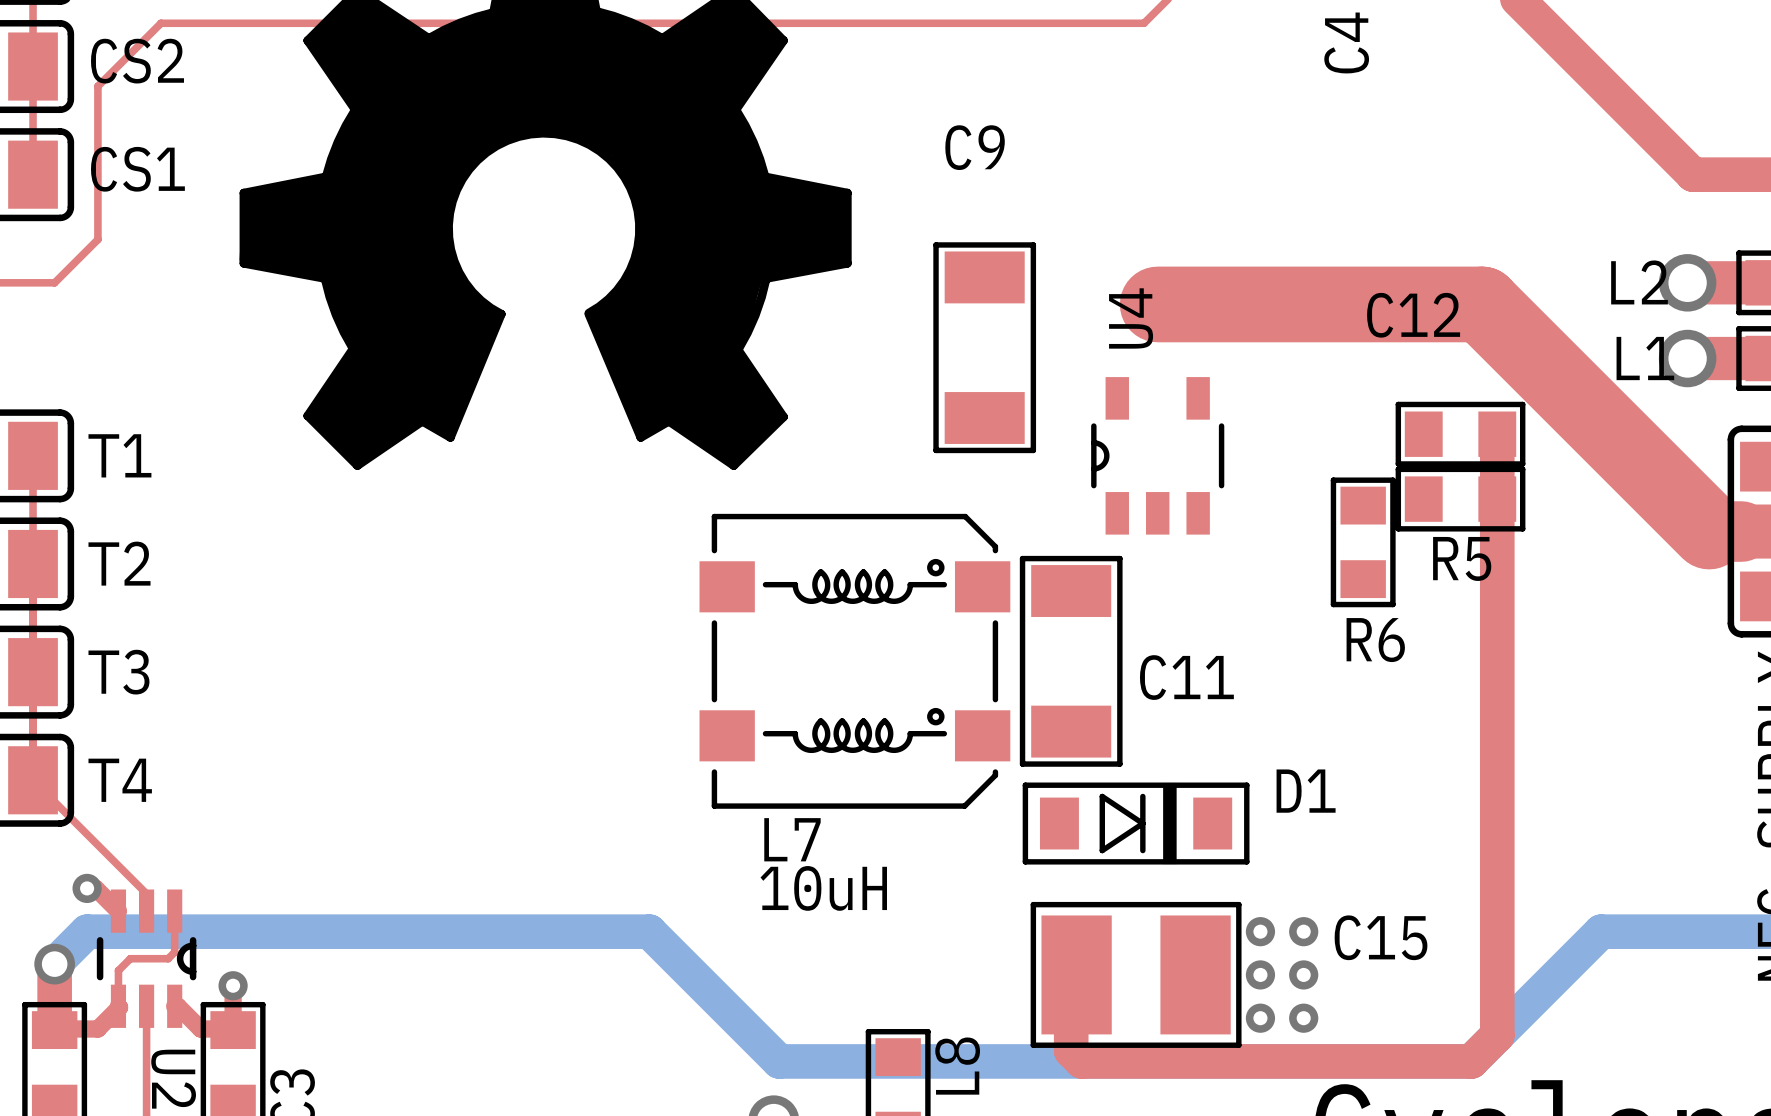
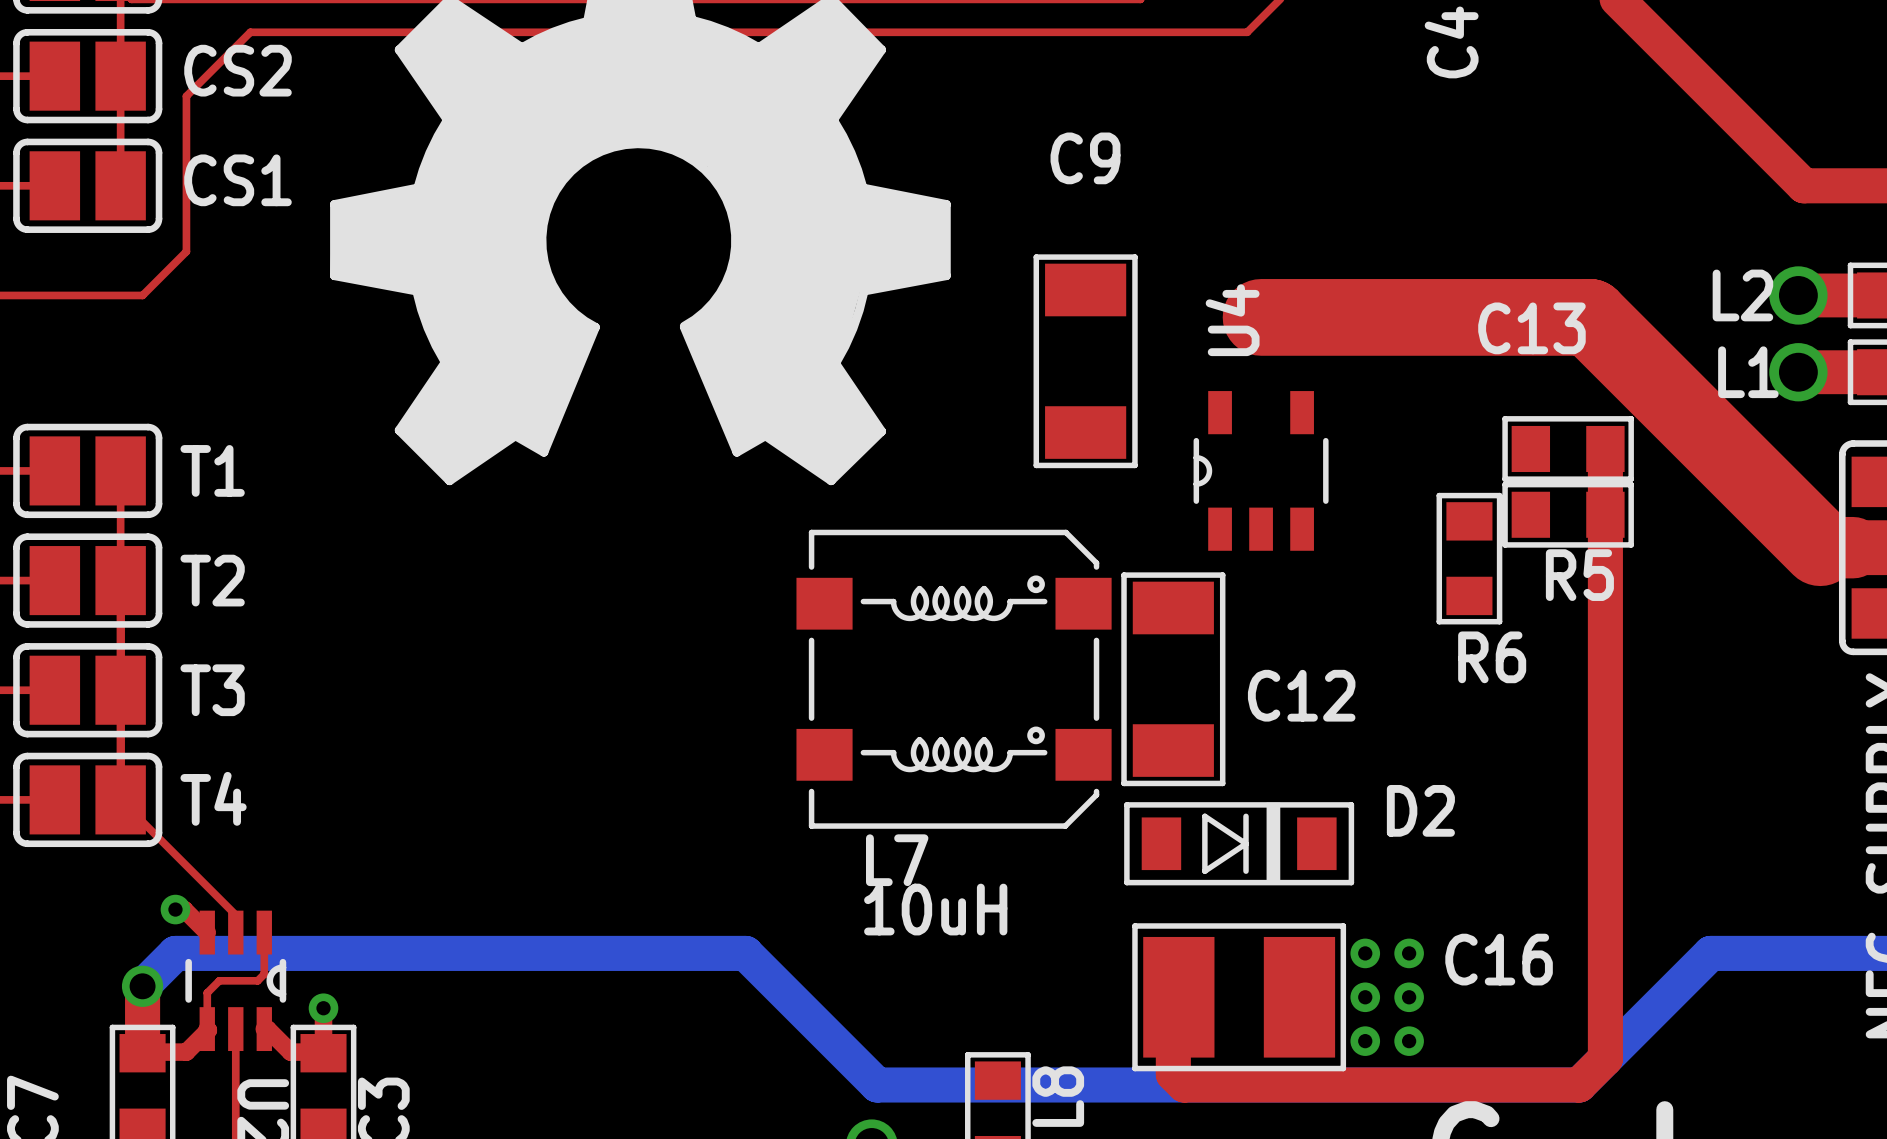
C12 name: C12 (1413, 315) -> C13 (1531, 328)
C11 name: C11 (1186, 677) -> C12 (1301, 695)
D1 name: D1 (1306, 791) -> D2 (1420, 810)
C15 name: C15 (1381, 937) -> C16 (1499, 959)

